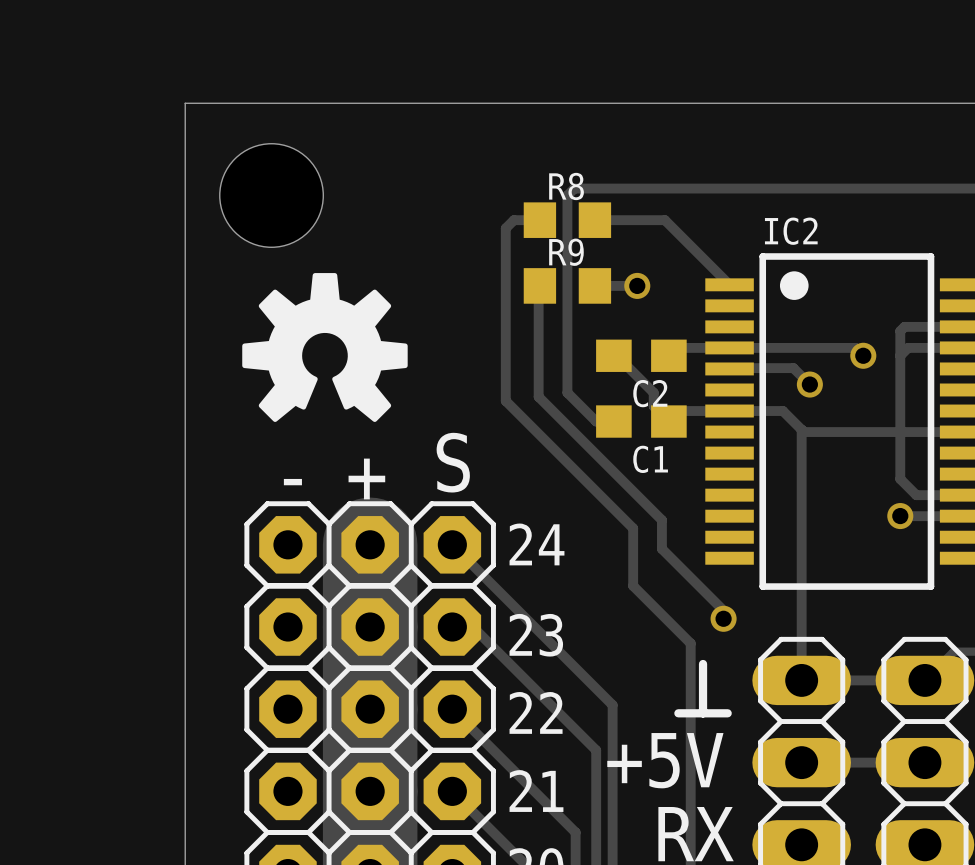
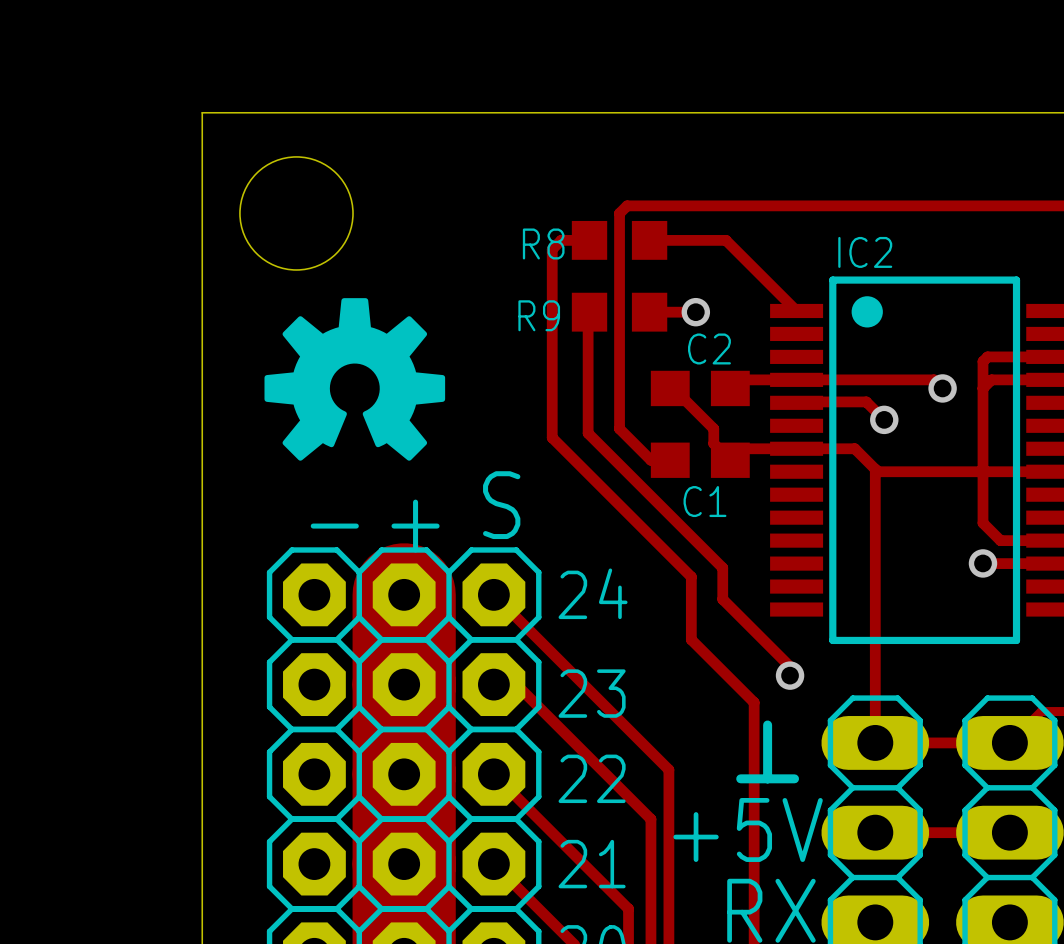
R8 name position: R8 (566, 186) -> R8 (543, 243)
R9 name position: R9 (566, 252) -> R9 (539, 315)
C2 name position: C2 (650, 393) -> C2 (709, 348)

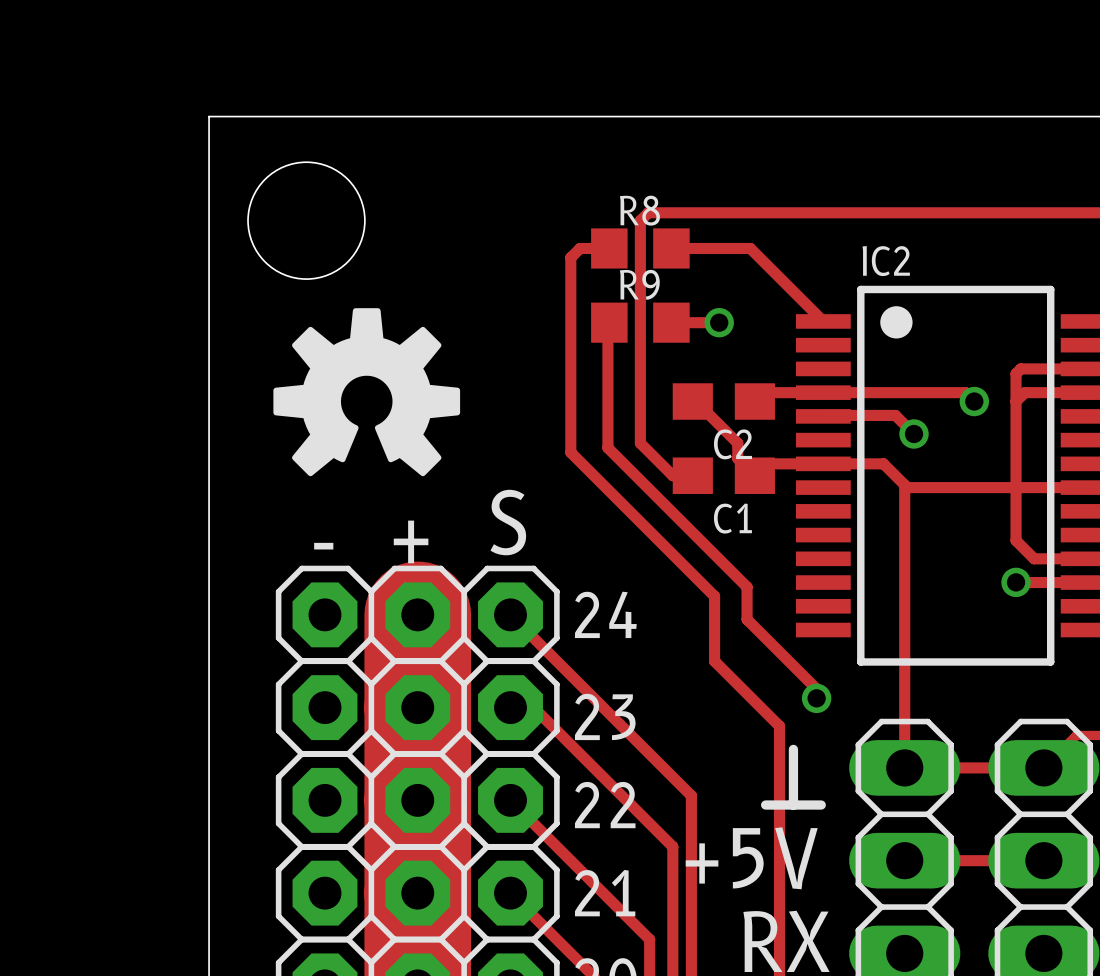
R8 name position: R8 (543, 243) -> R8 (639, 210)
R9 name position: R9 (539, 315) -> R9 (639, 284)
C2 name position: C2 (709, 348) -> C2 (732, 444)

